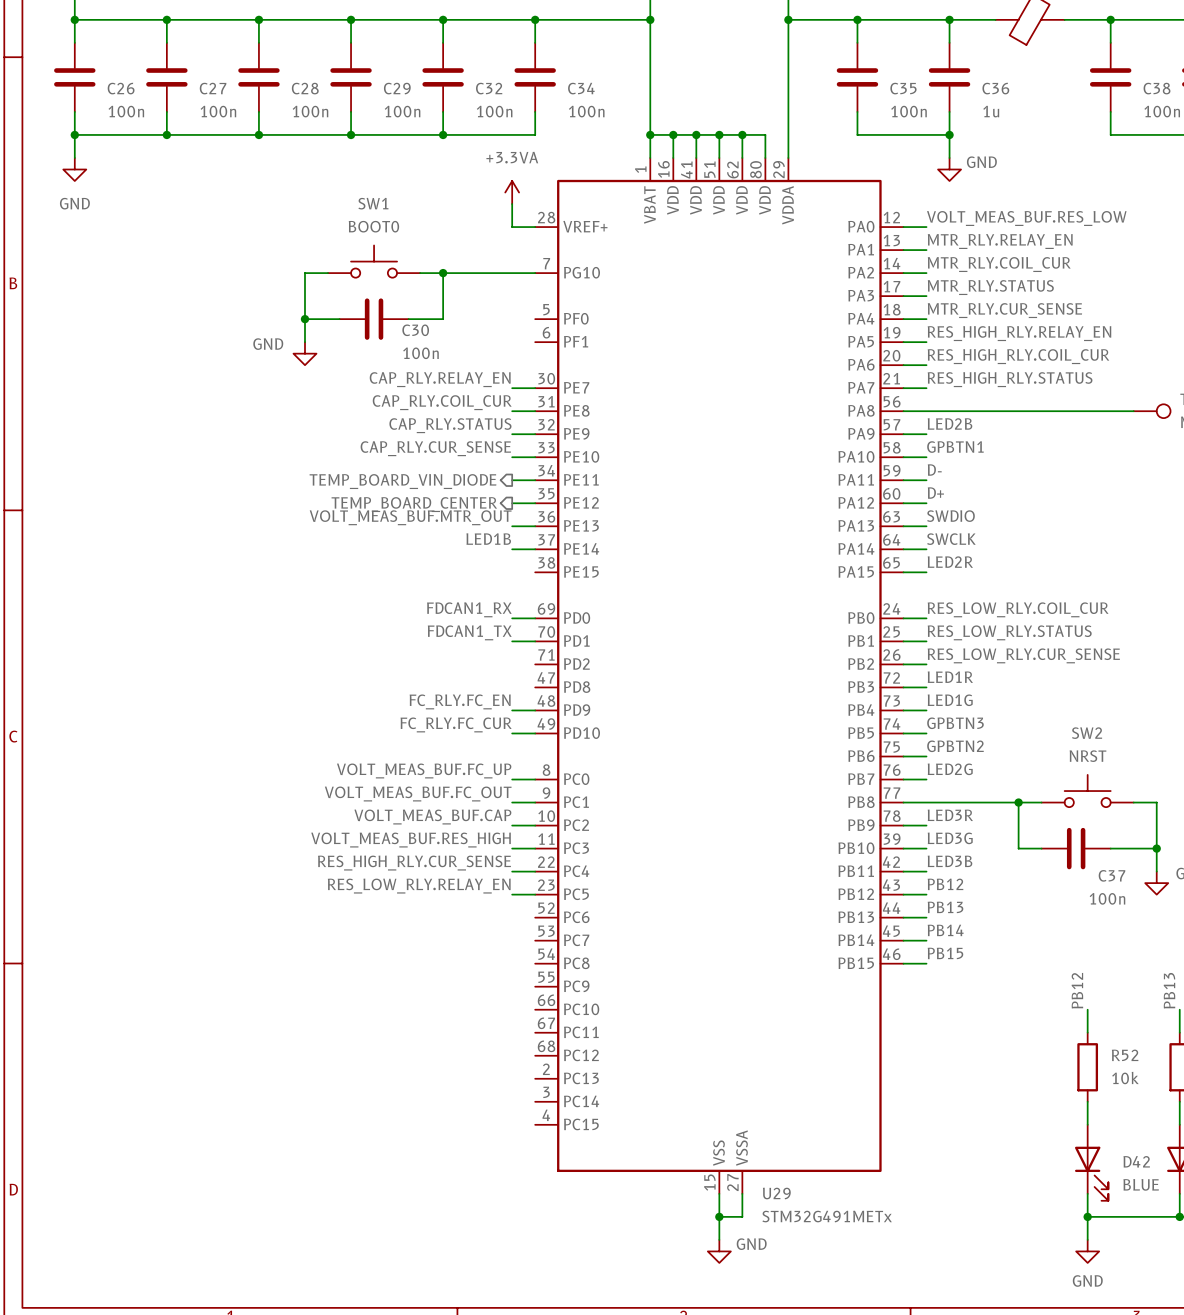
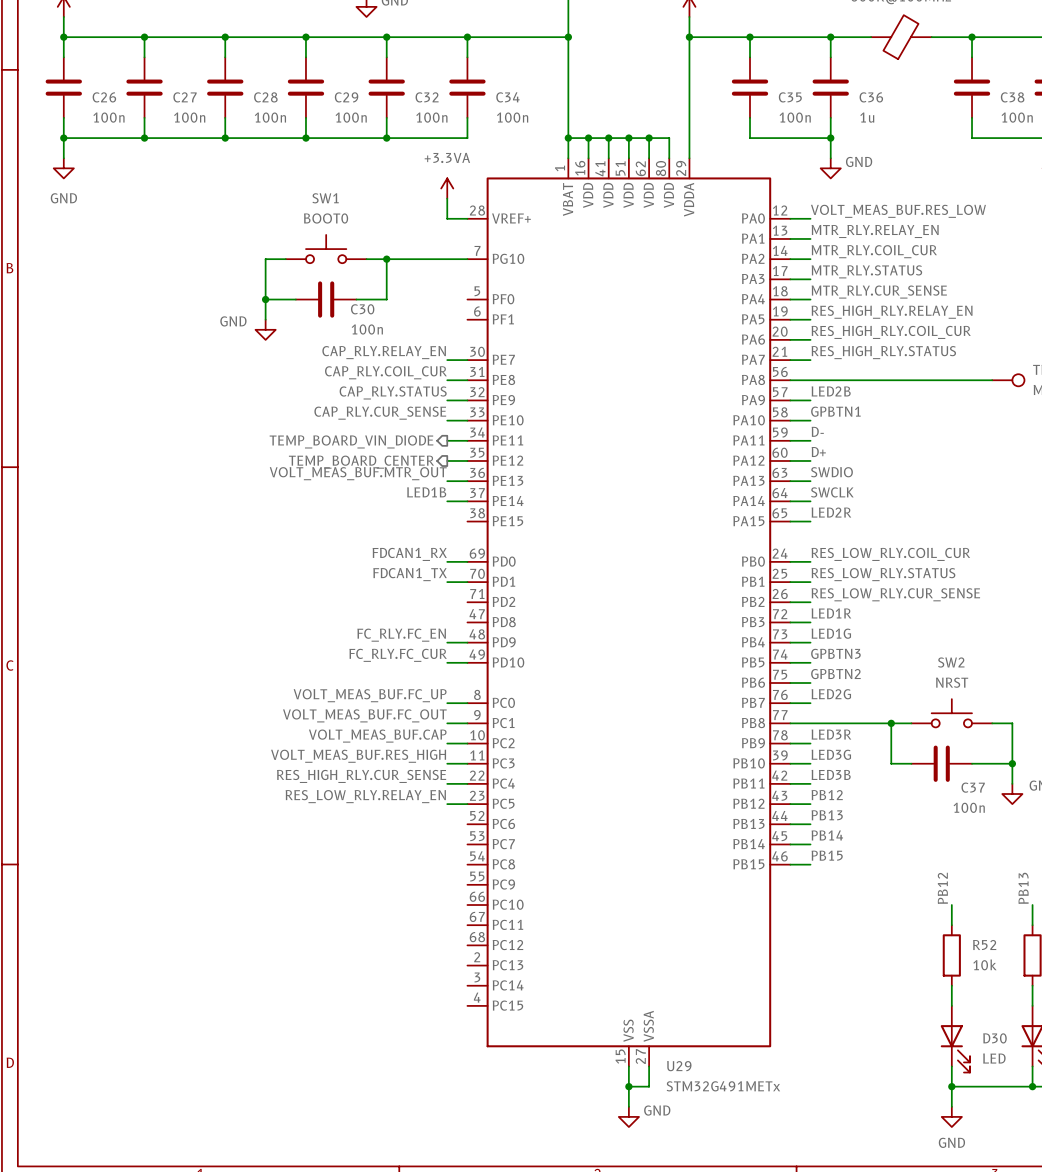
D42 name: D42 (1136, 1161) -> D30 (994, 1038)
D42 value: BLUE (1141, 1184) -> LED (994, 1058)

